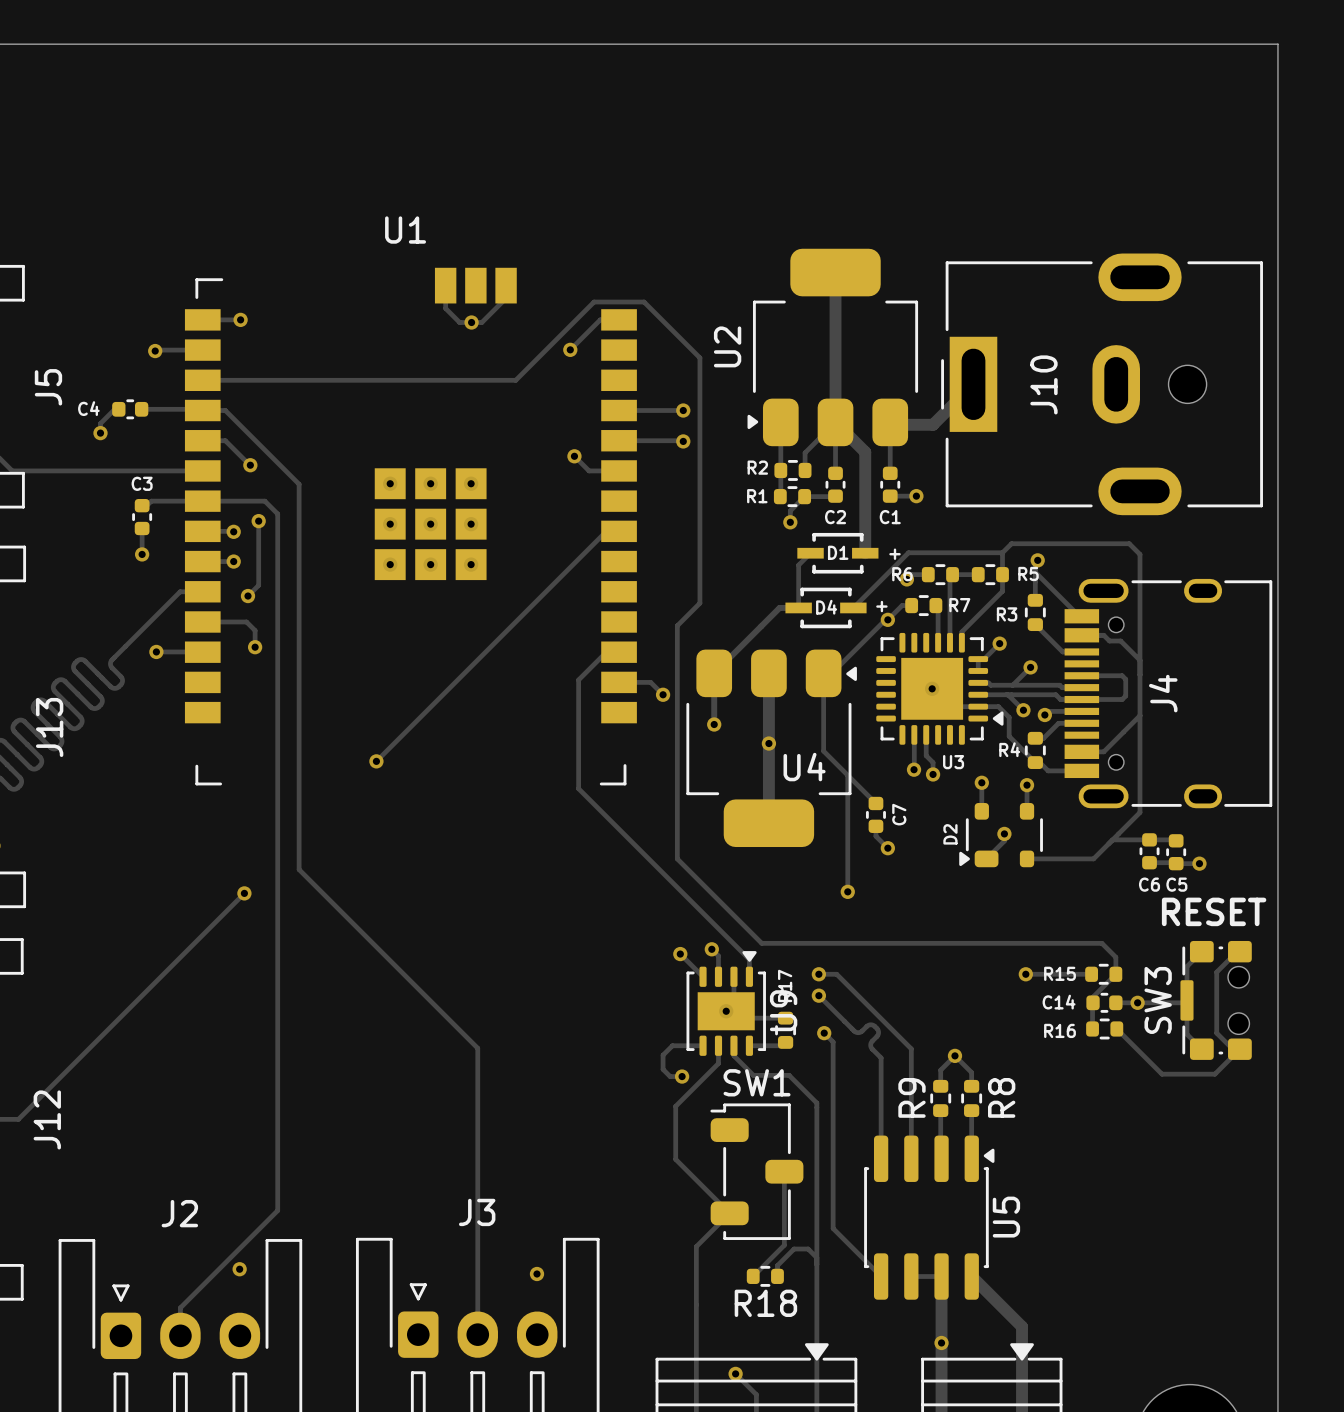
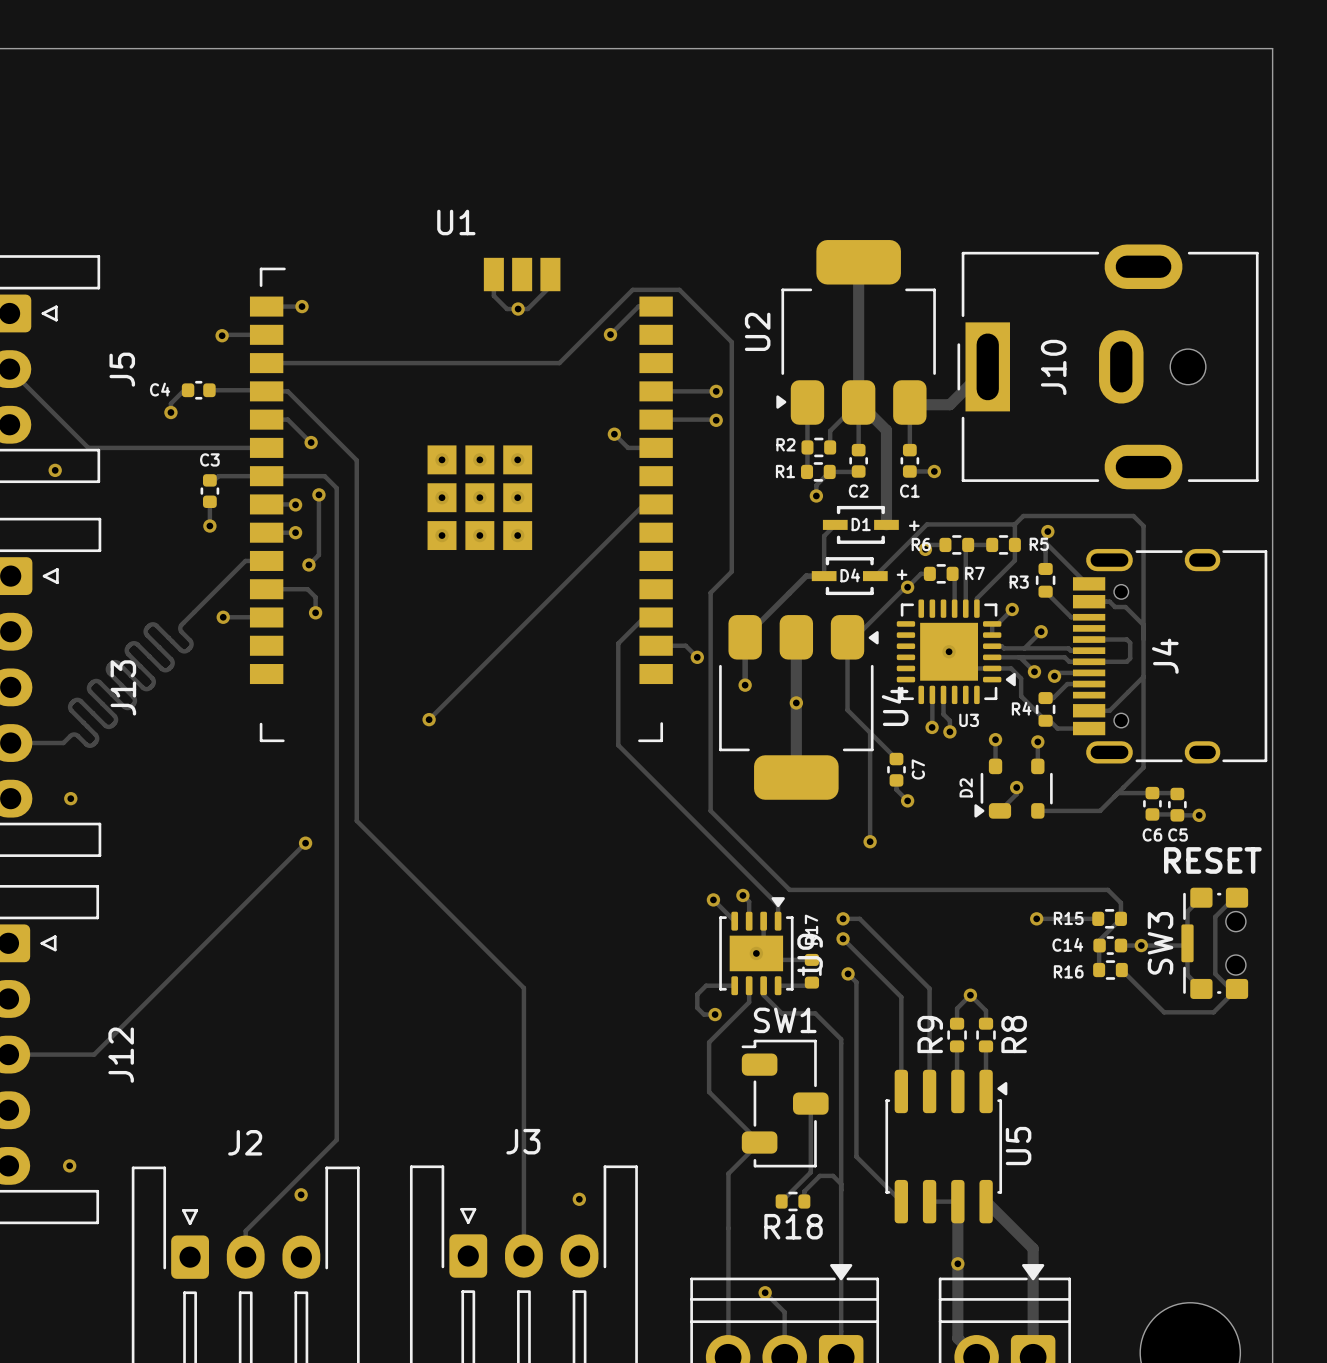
U4 name rotation: 0° (804, 767) -> 90° counterclockwise (895, 706)
U4 name position: U4 (804, 767) -> U4 (895, 706)
track: (854, 1031) (860, 1032) (869, 1024) (874, 1026) (878, 1033) (871, 1043) (872, 1049) -> (876, 971) (893, 988)

